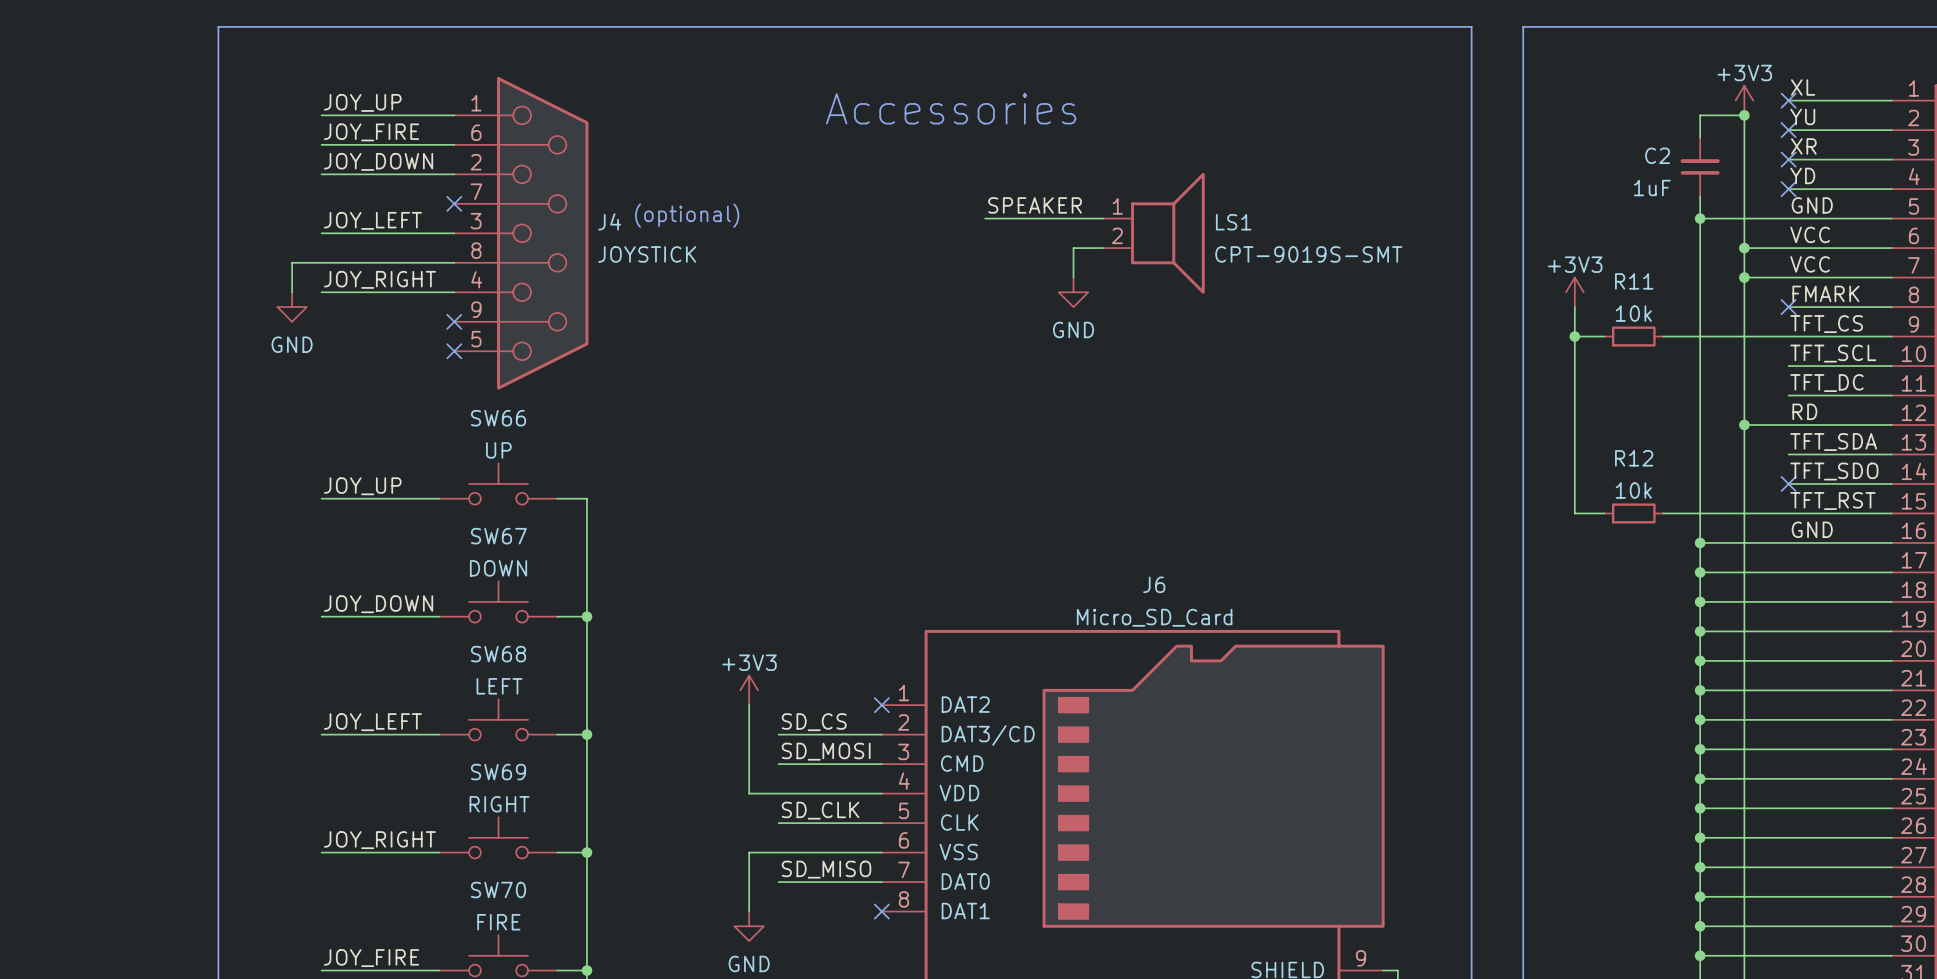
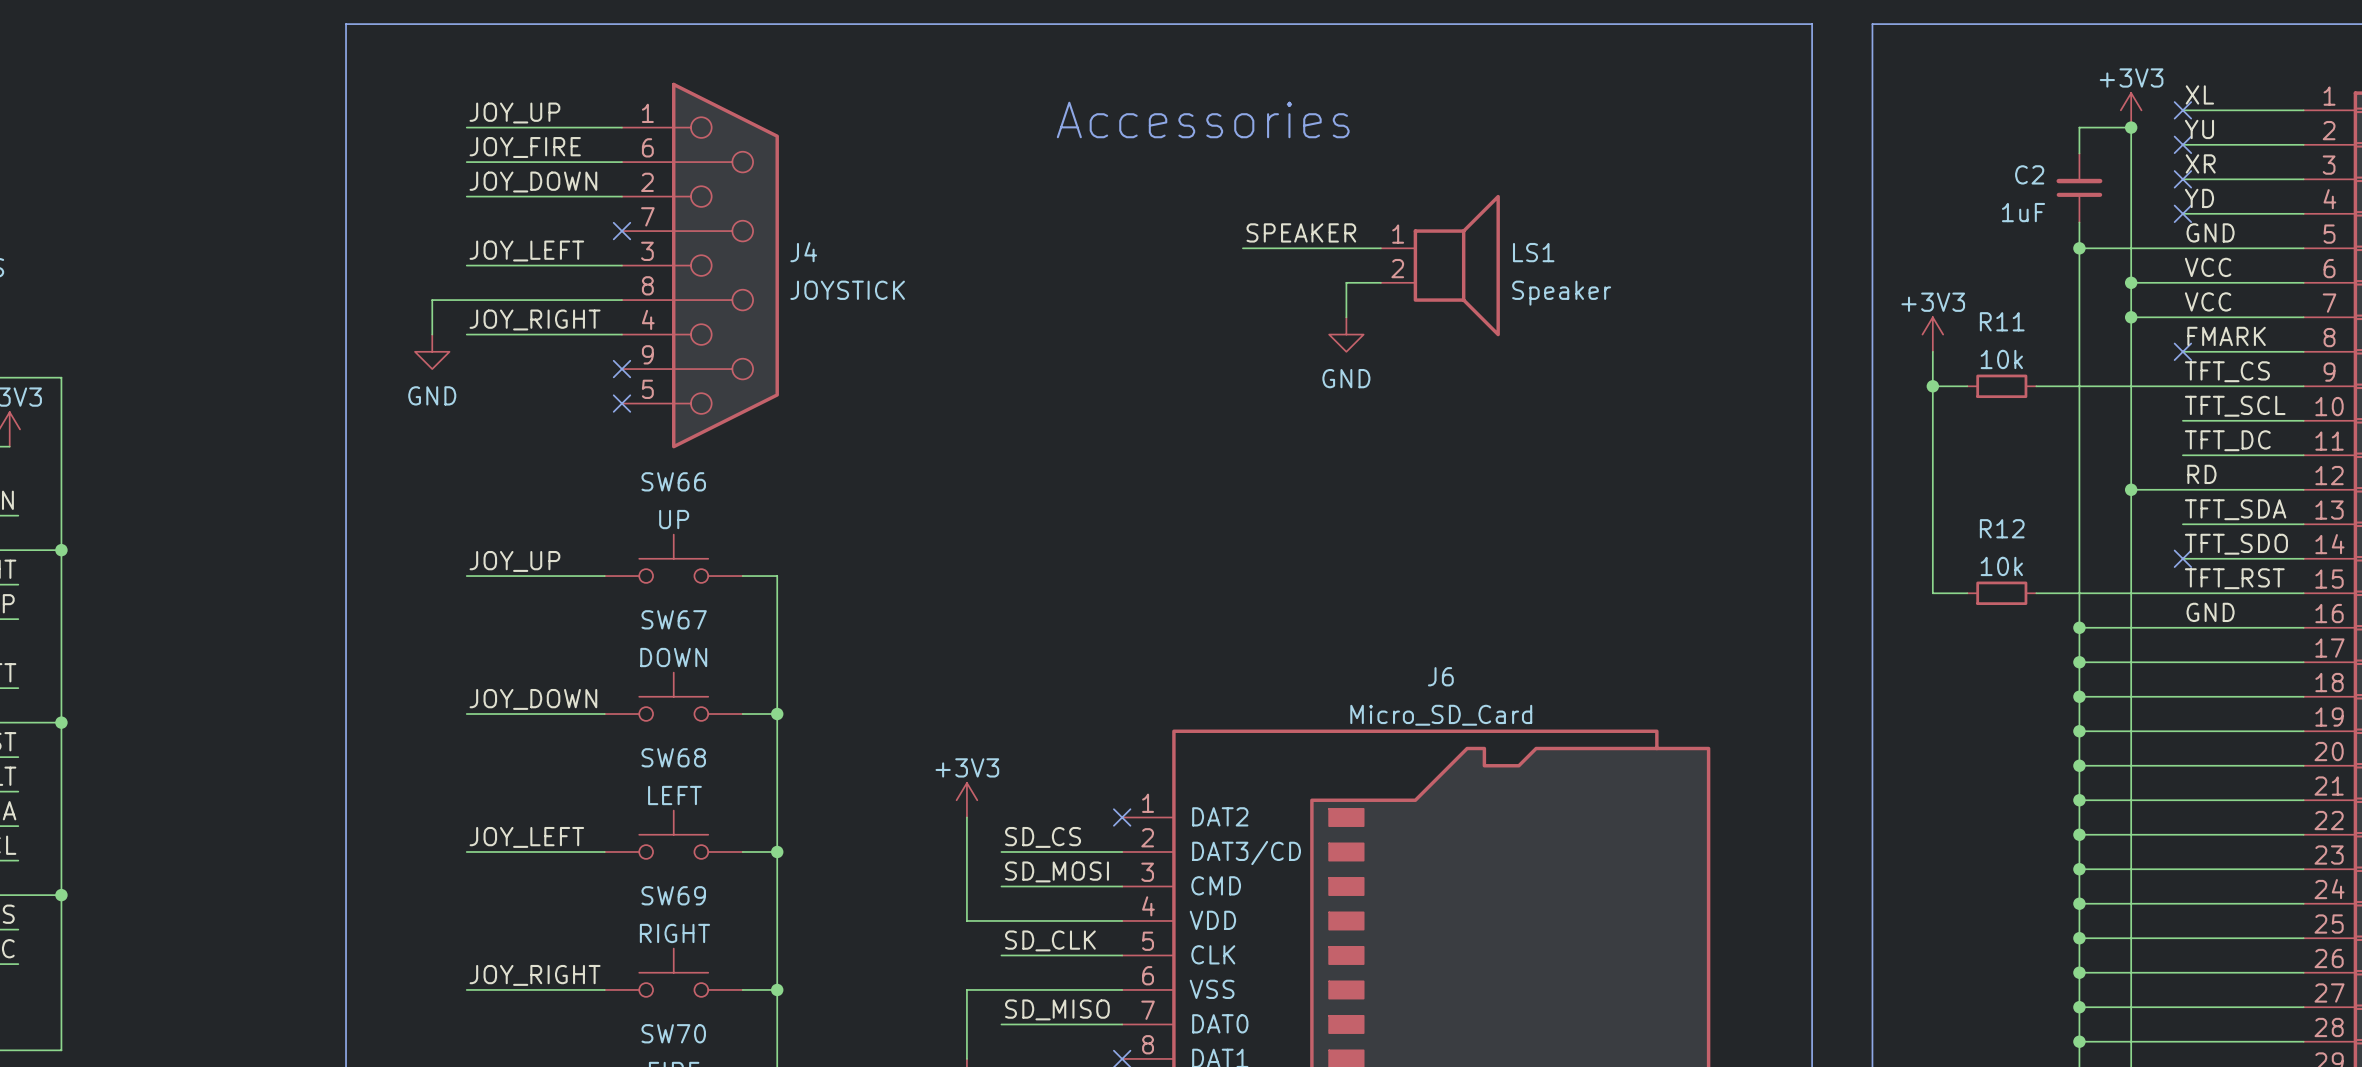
text: (optional) (687, 215) -> none
LS1 value: CPT-9019S-SMT (1308, 254) -> Speaker (1561, 293)

